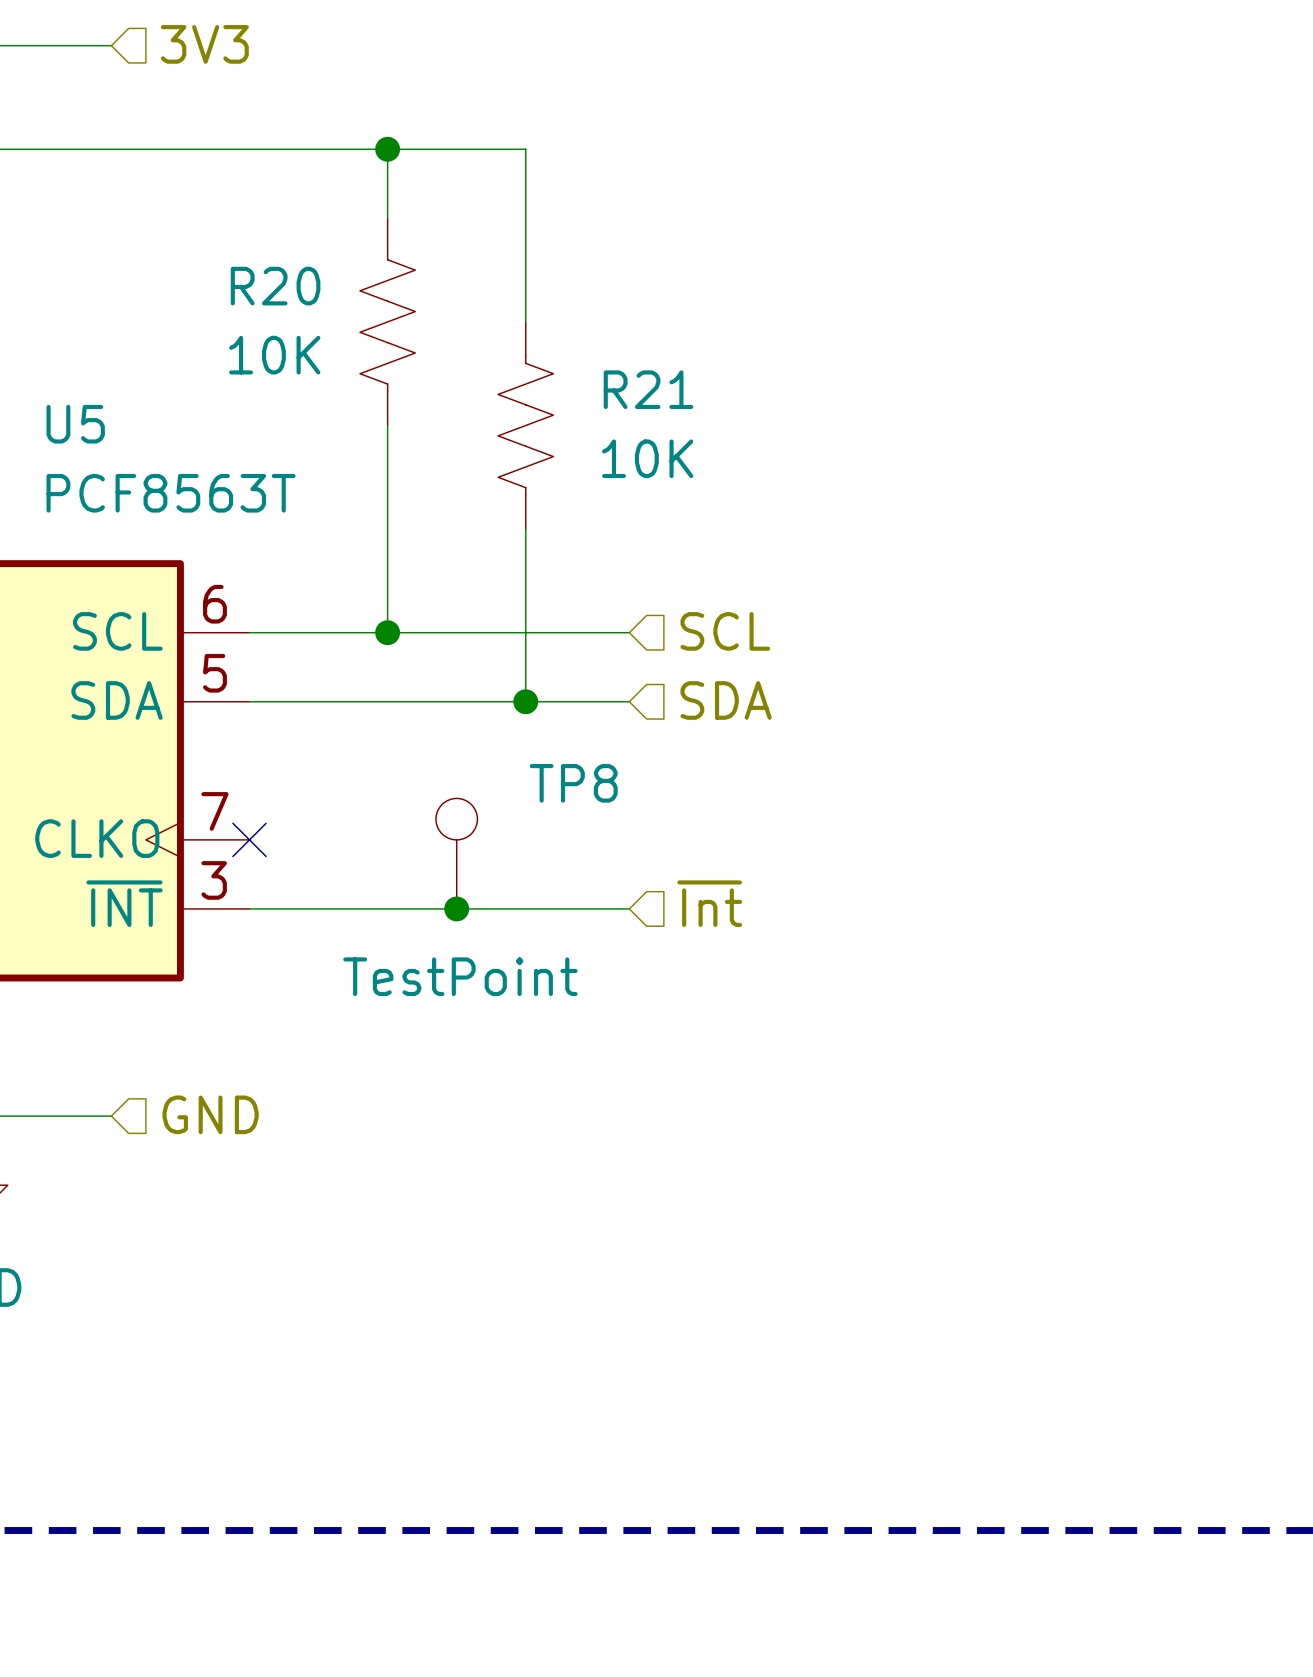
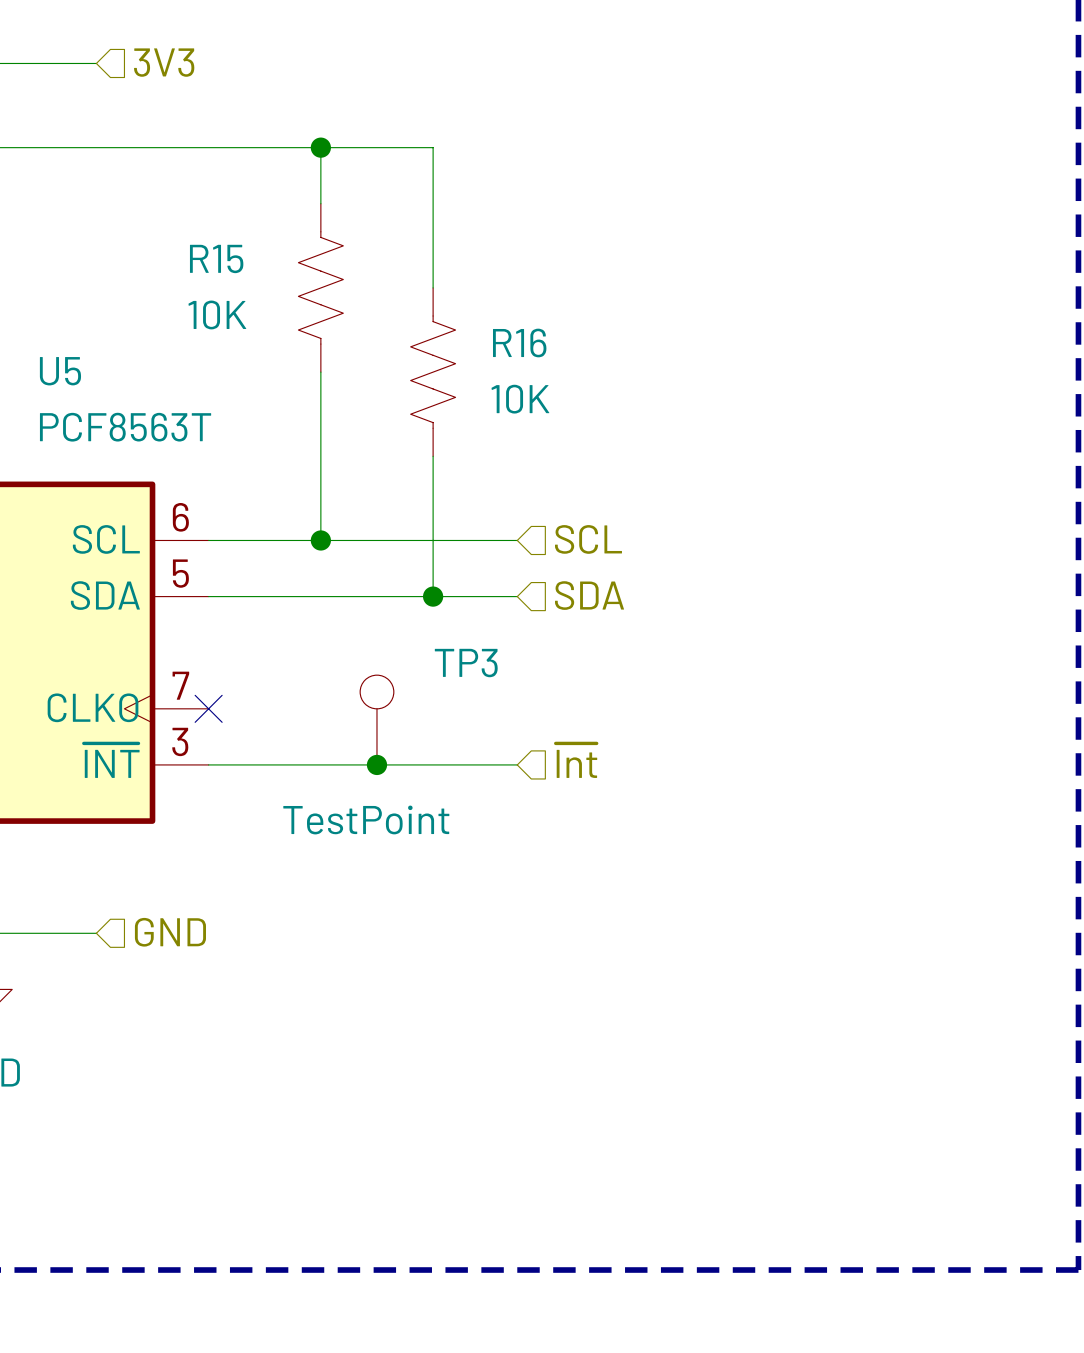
R20 name: R20 (275, 286) -> R15 (216, 258)
R21 name: R21 (648, 389) -> R16 (519, 342)
TP8 name: TP8 (573, 783) -> TP3 (466, 663)

